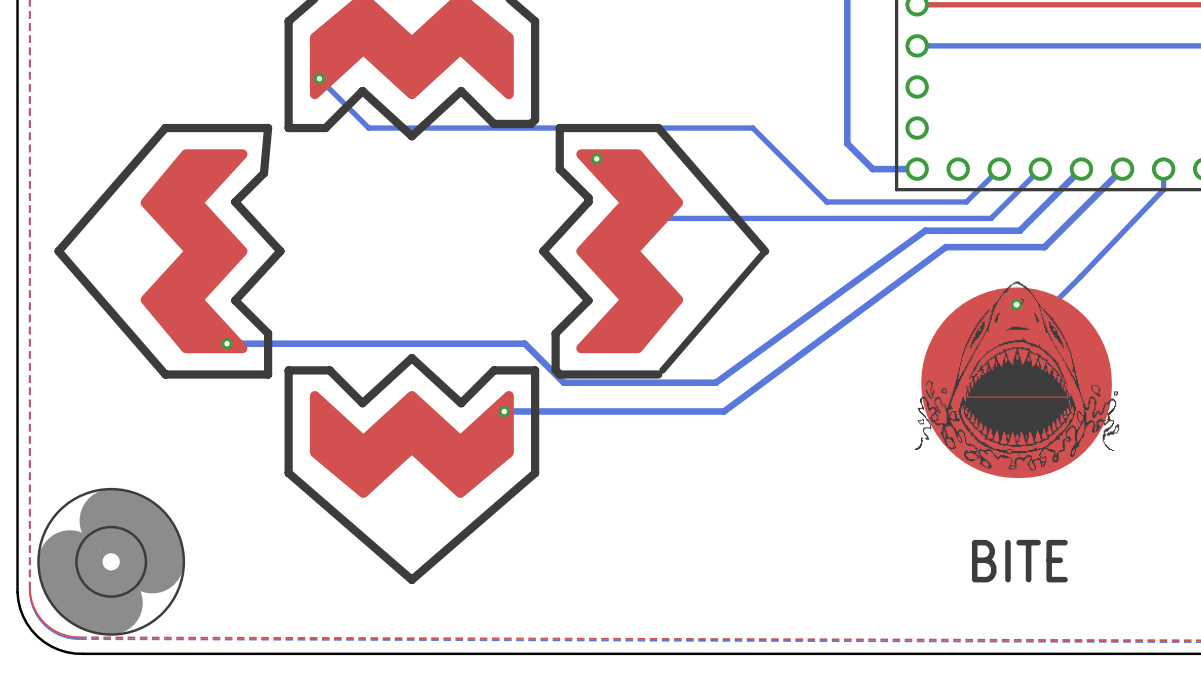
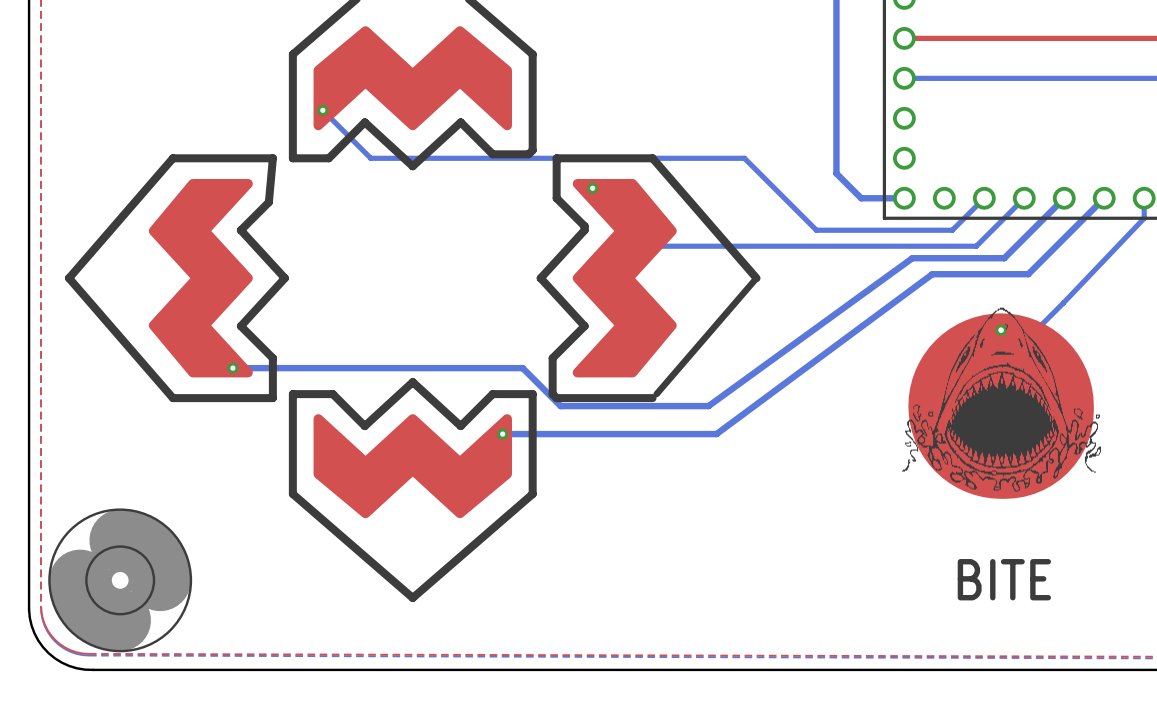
drawing: none -> [952, 419, 1051, 421]

